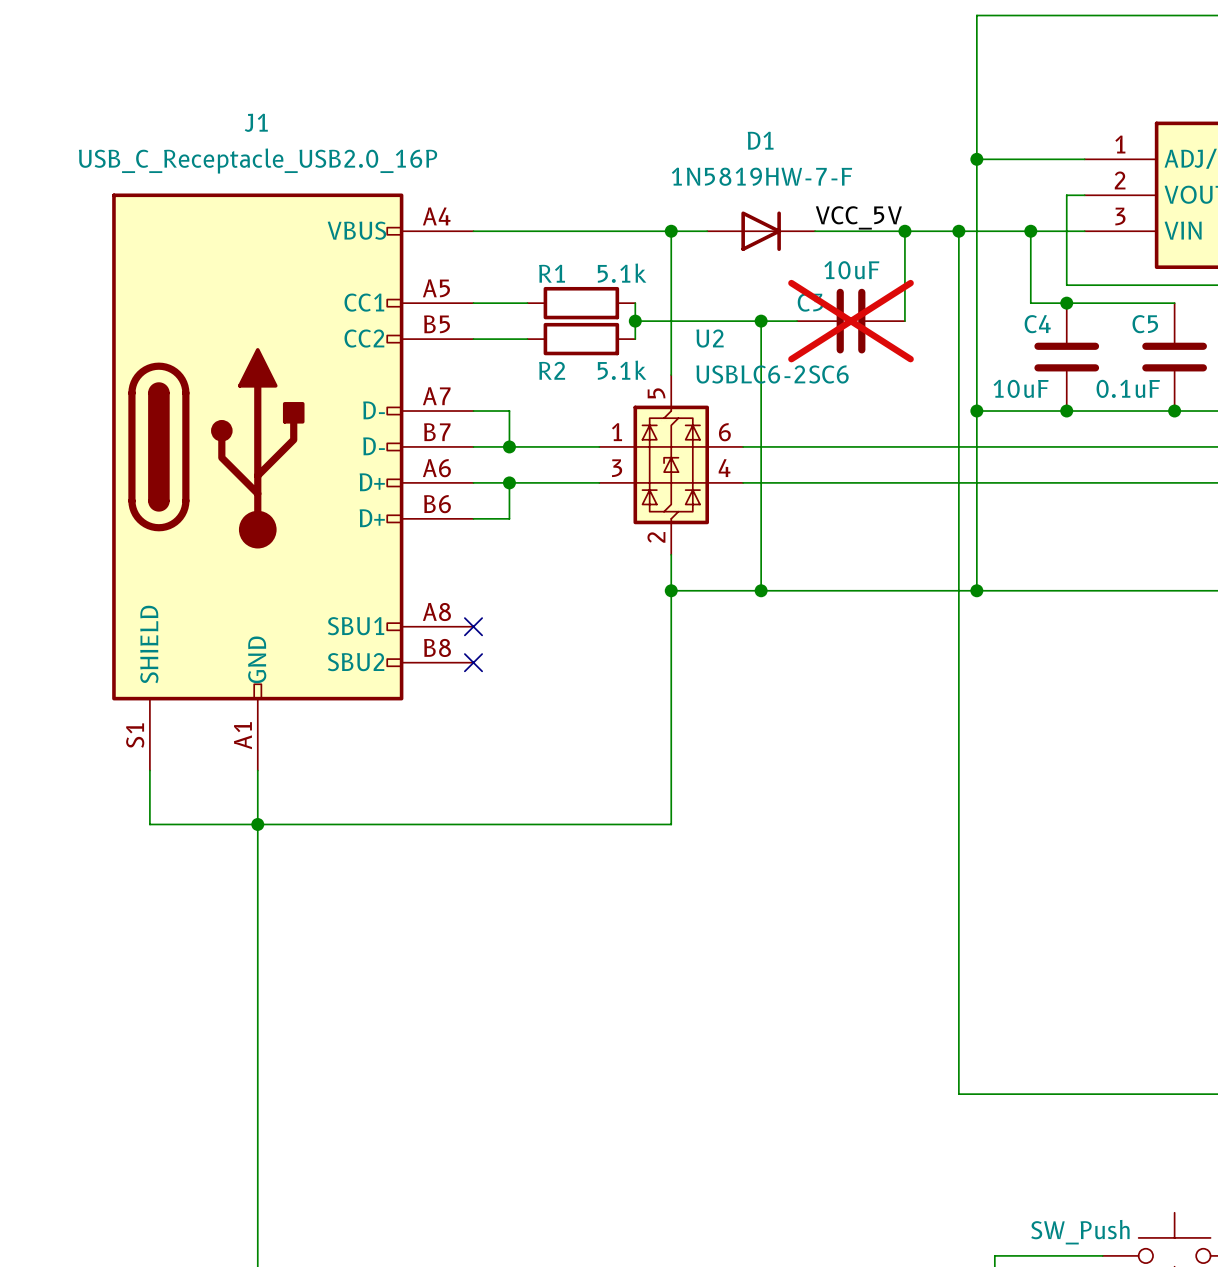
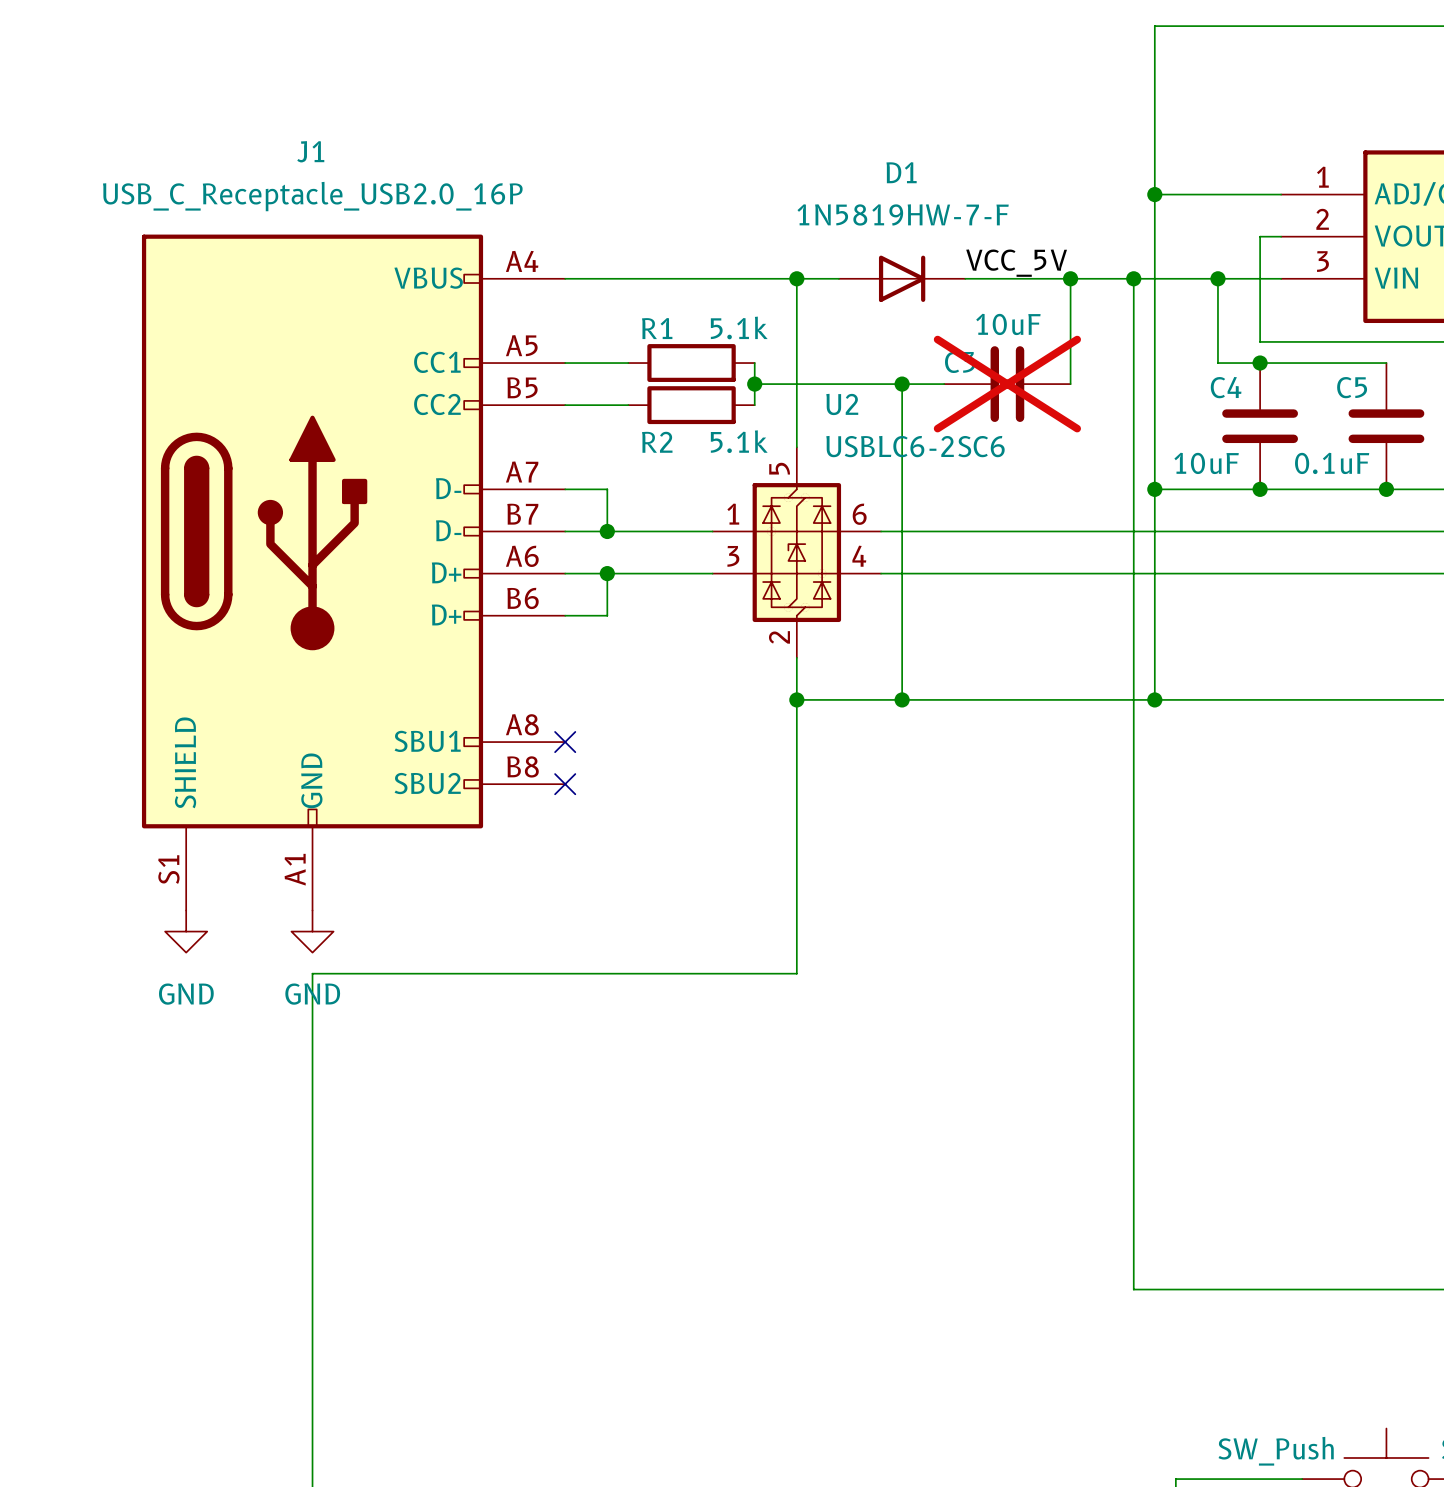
wire: (149, 770) (149, 824) (257, 824) (257, 770) -> none
power symbol: none -> GND (186, 931)
power symbol: none -> GND (312, 931)
junction: (257, 824) -> none

